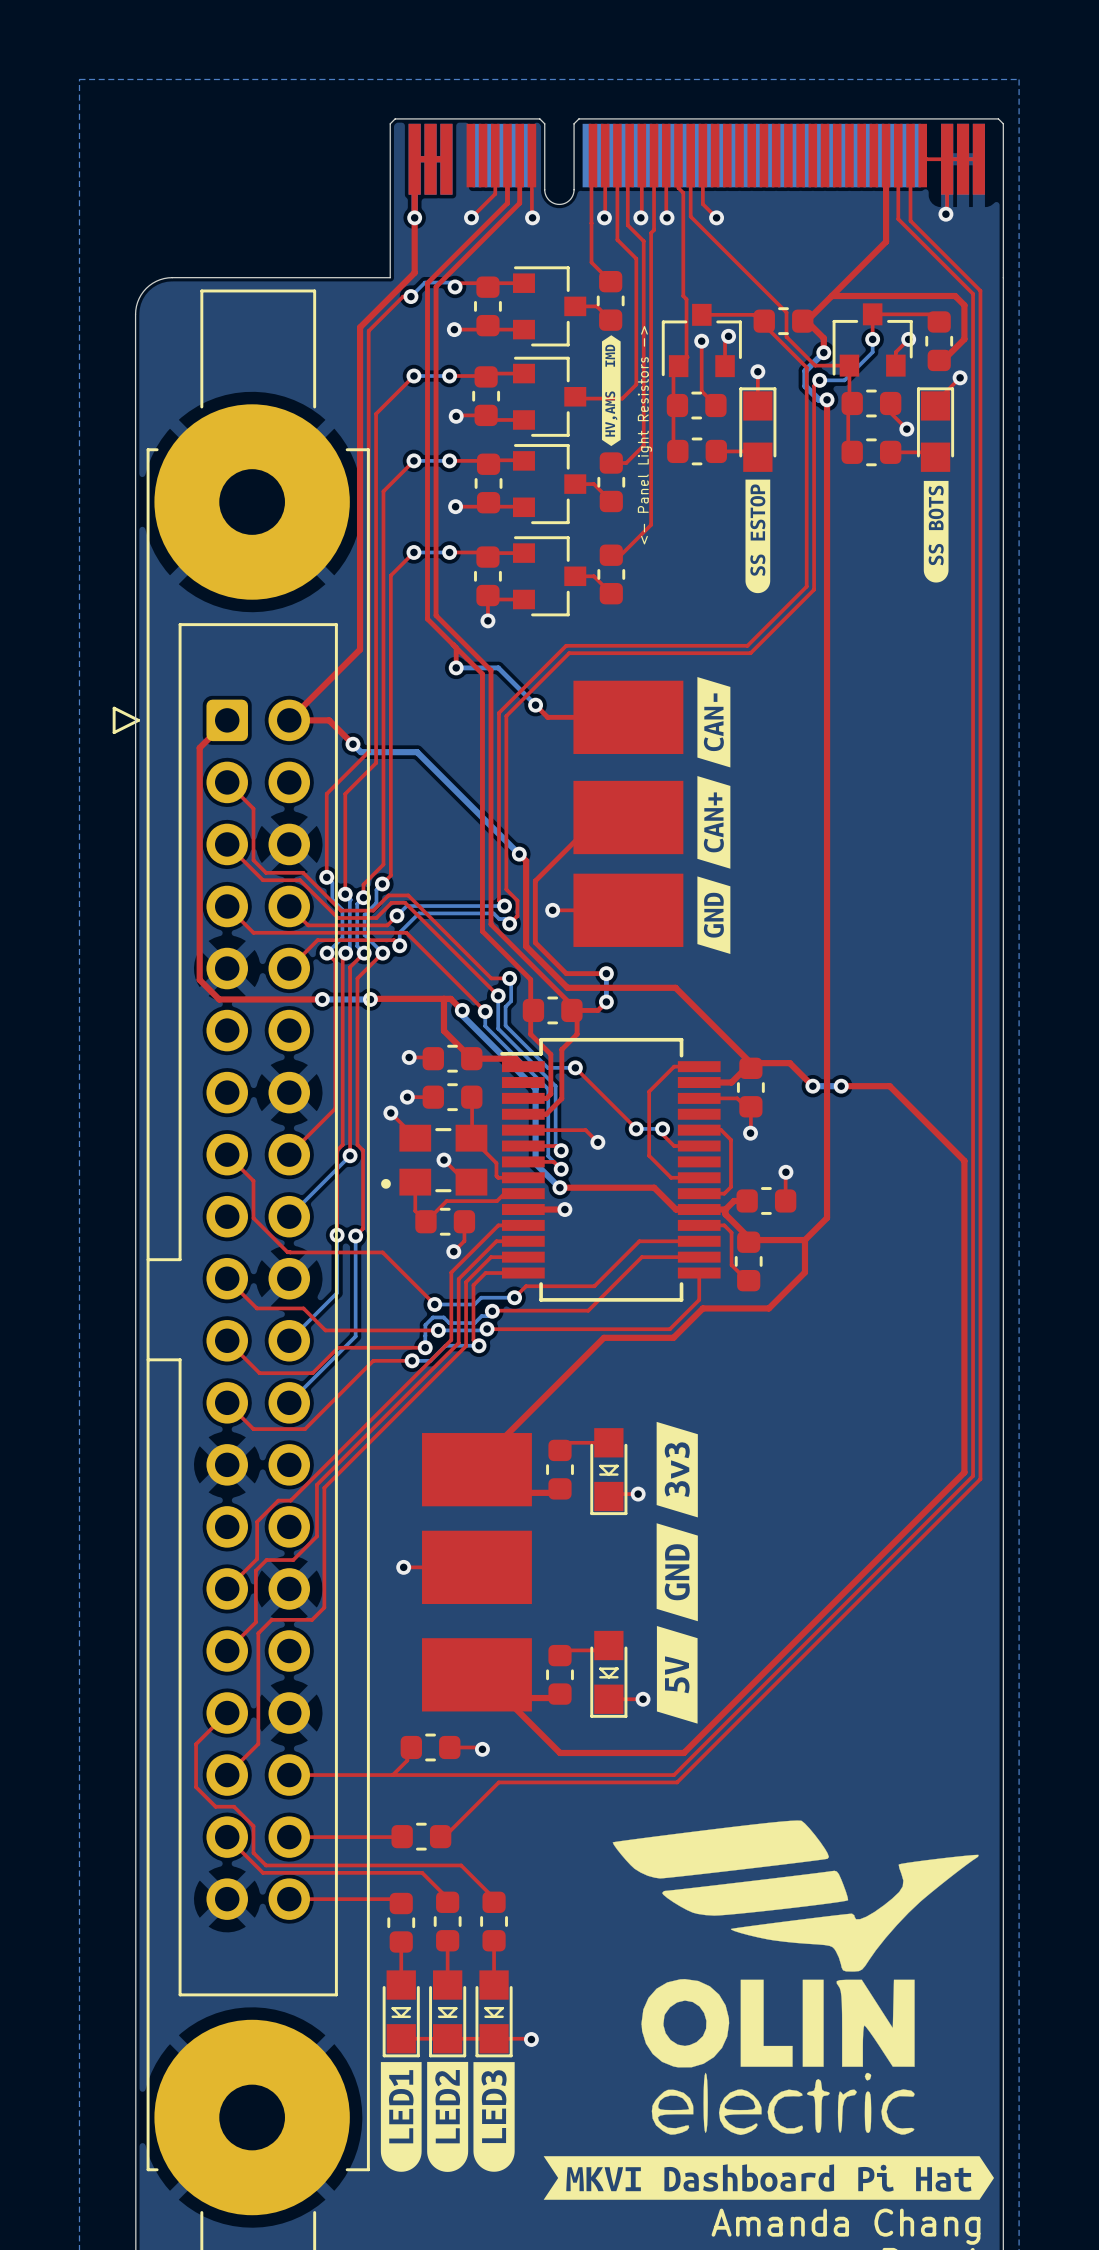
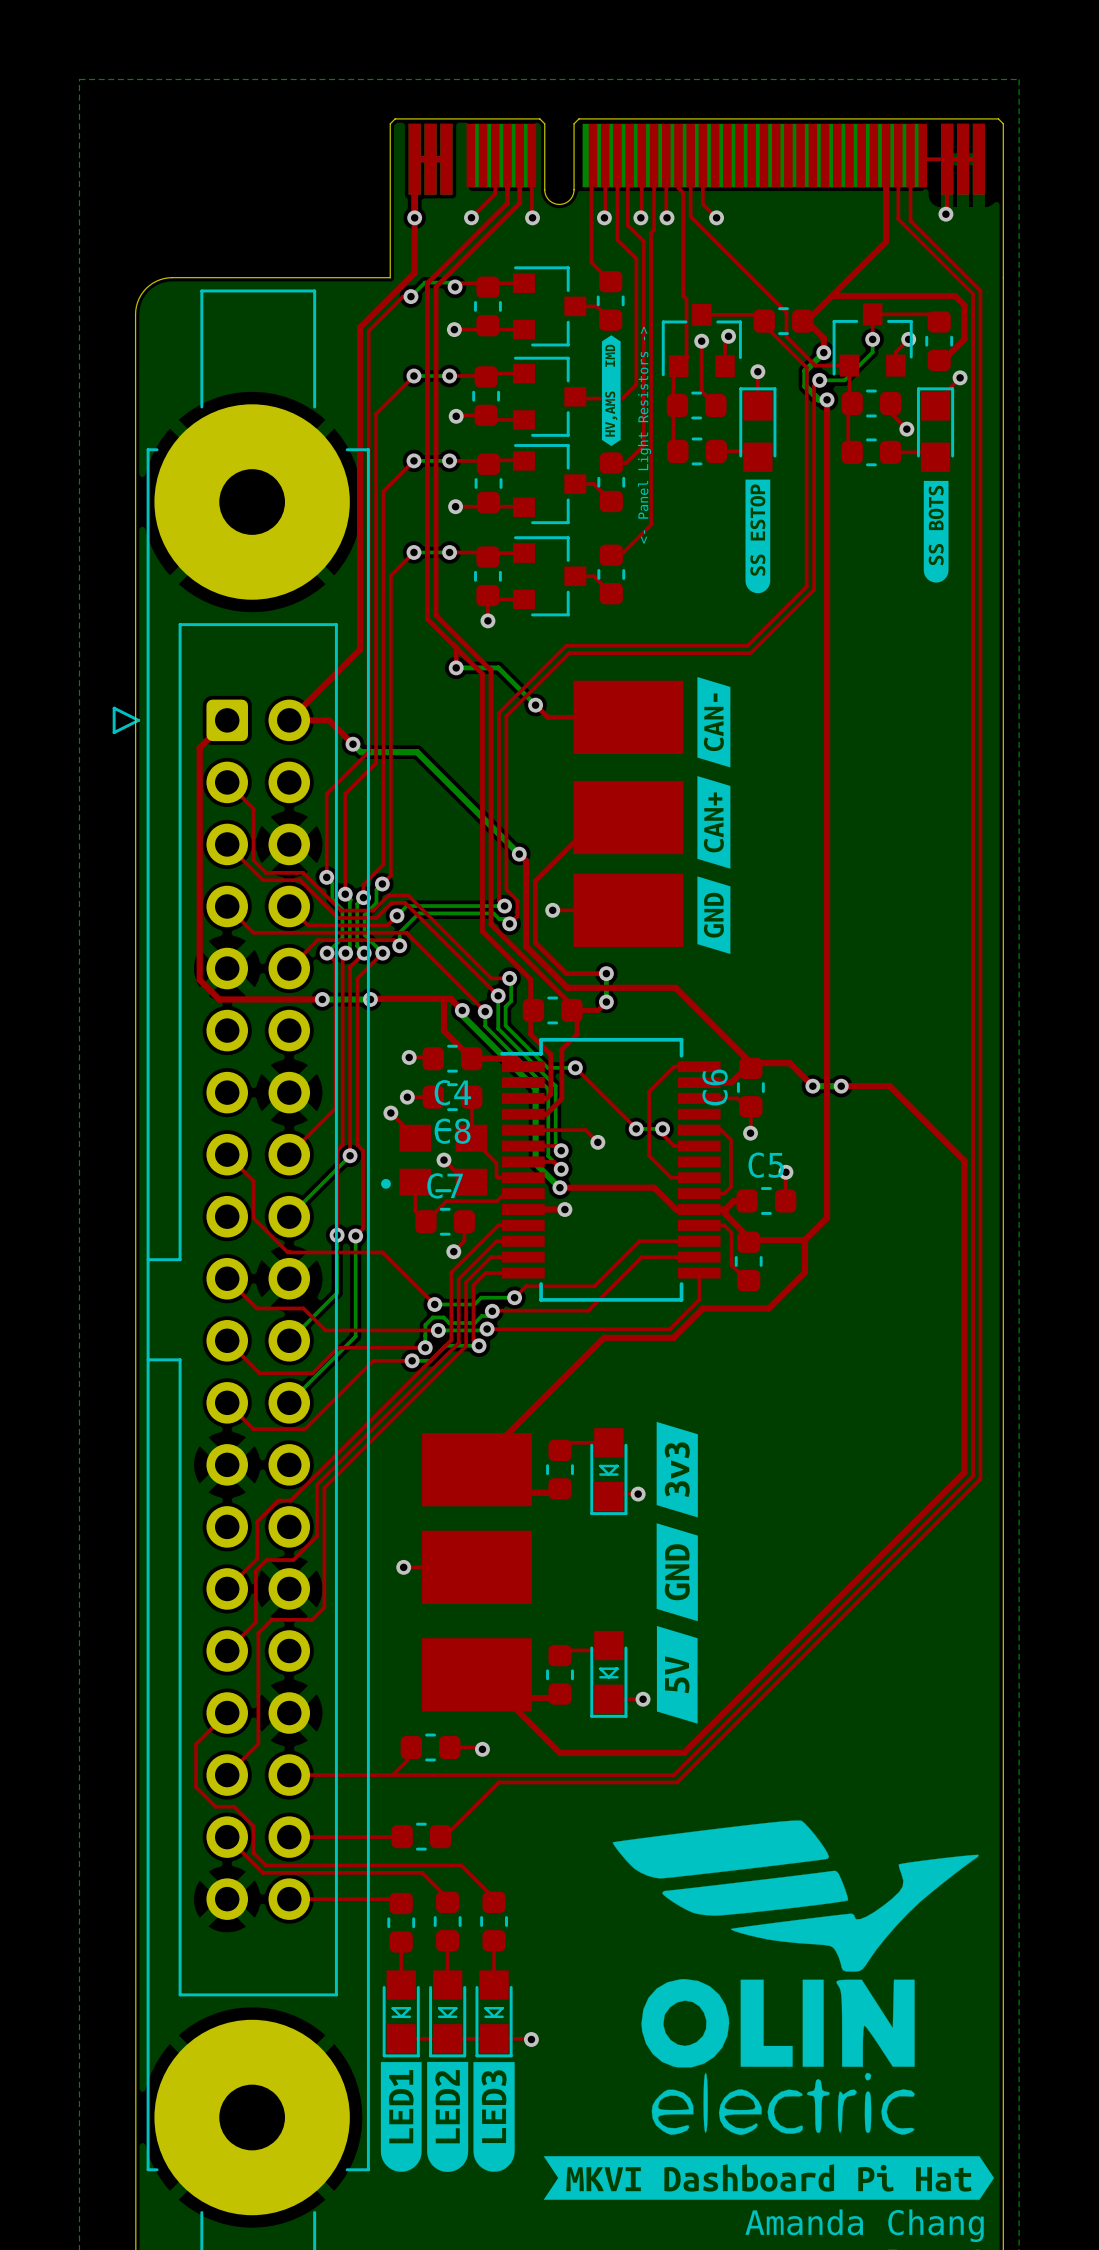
C6 name: none -> C6 (715, 1087)
C4 name: none -> C4 (452, 1092)
C8 name: none -> C8 (452, 1131)
C5 name: none -> C5 (766, 1165)
C7 name: none -> C7 (445, 1185)

